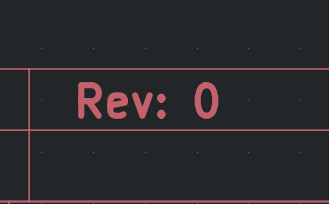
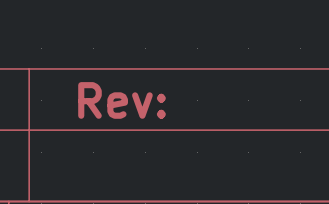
title block: Rev: 0 (148, 100) -> Rev: (122, 100)

